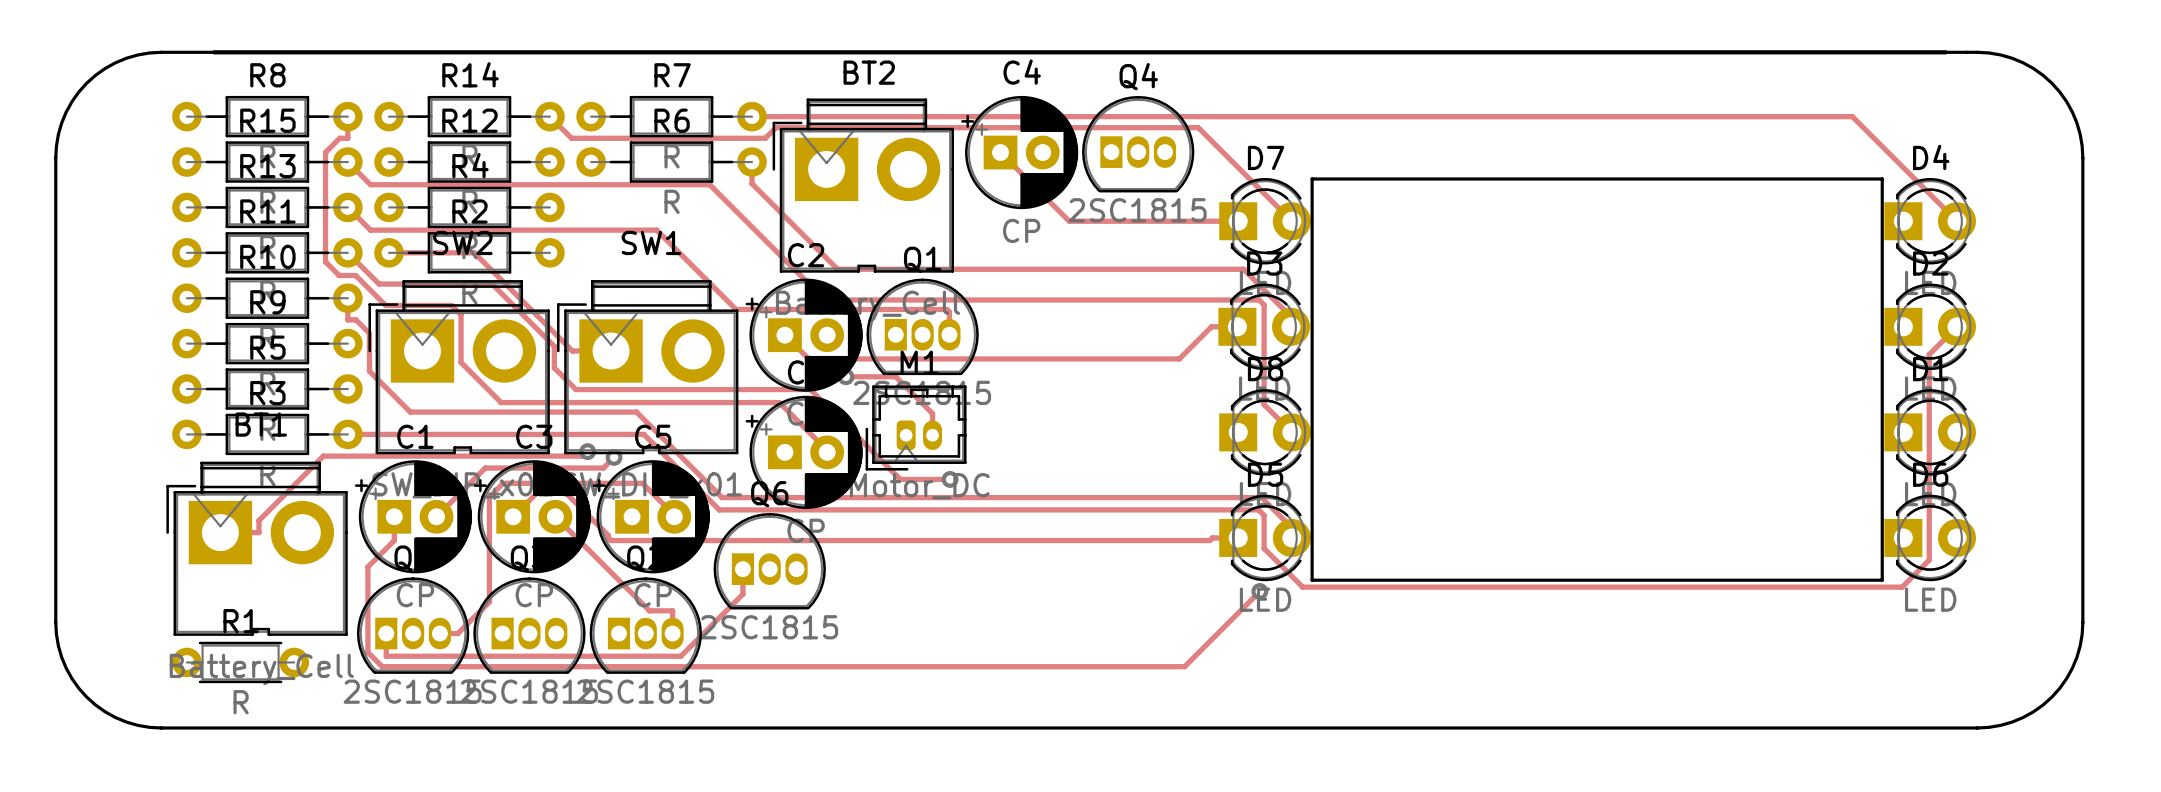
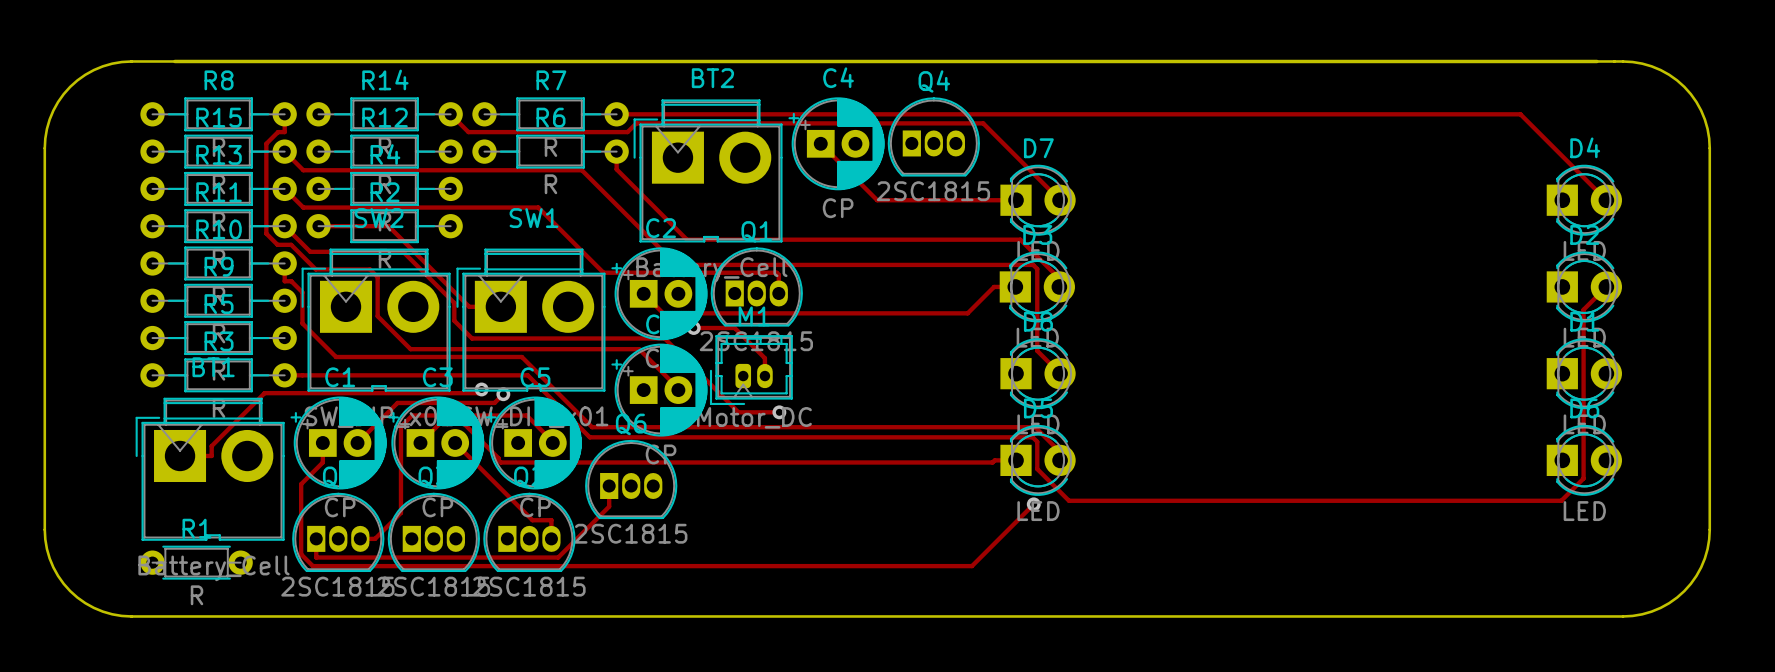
board edge: (1312, 179) (1882, 179) (1882, 580) (1312, 580) (1312, 179) -> none

